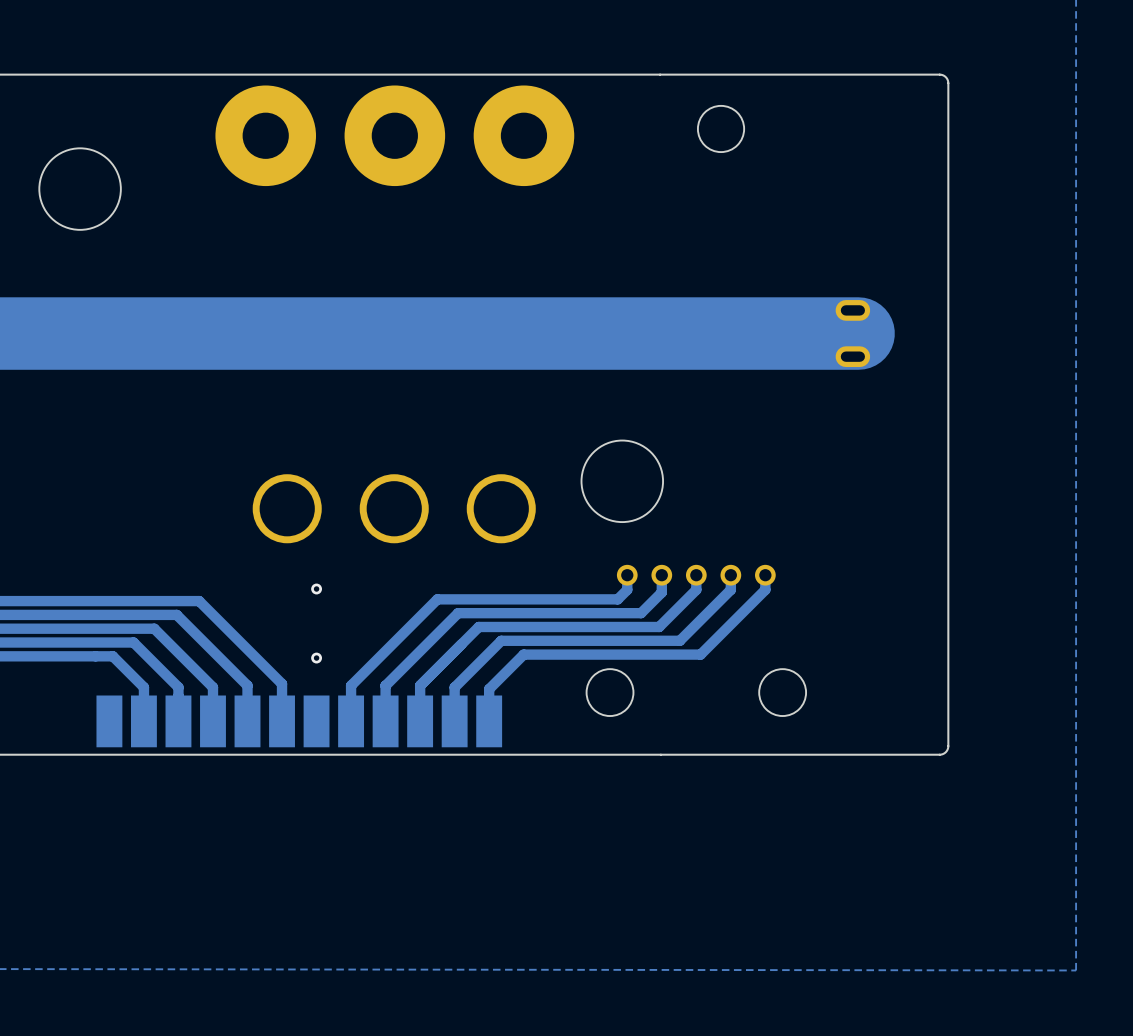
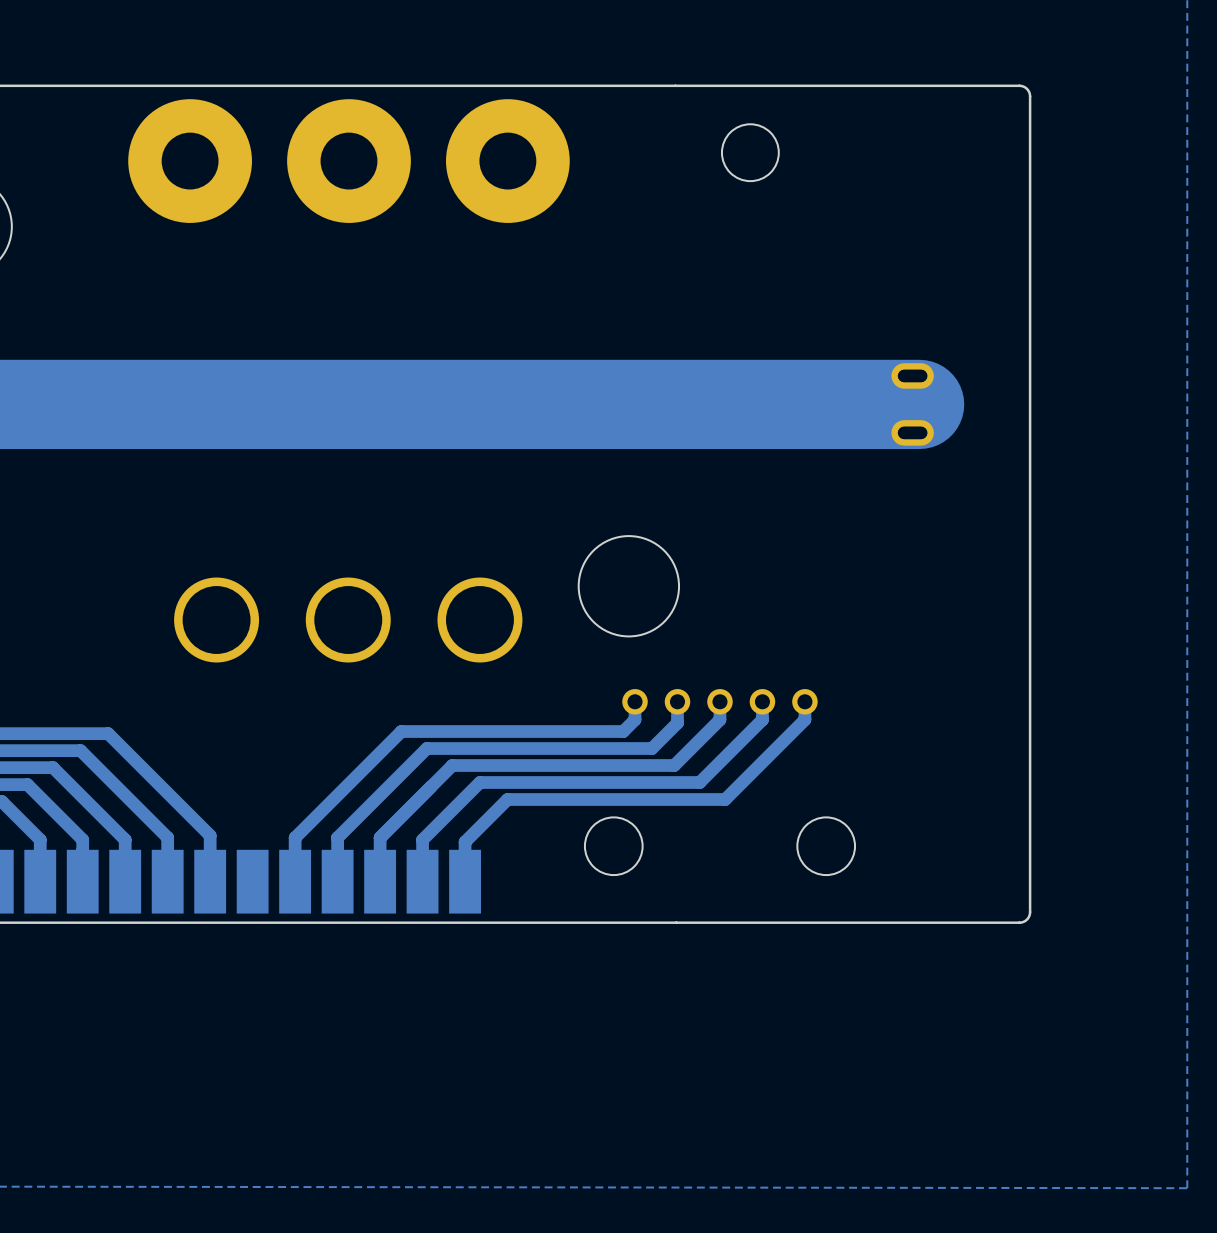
via: (316, 589) -> none
via: (316, 658) -> none

